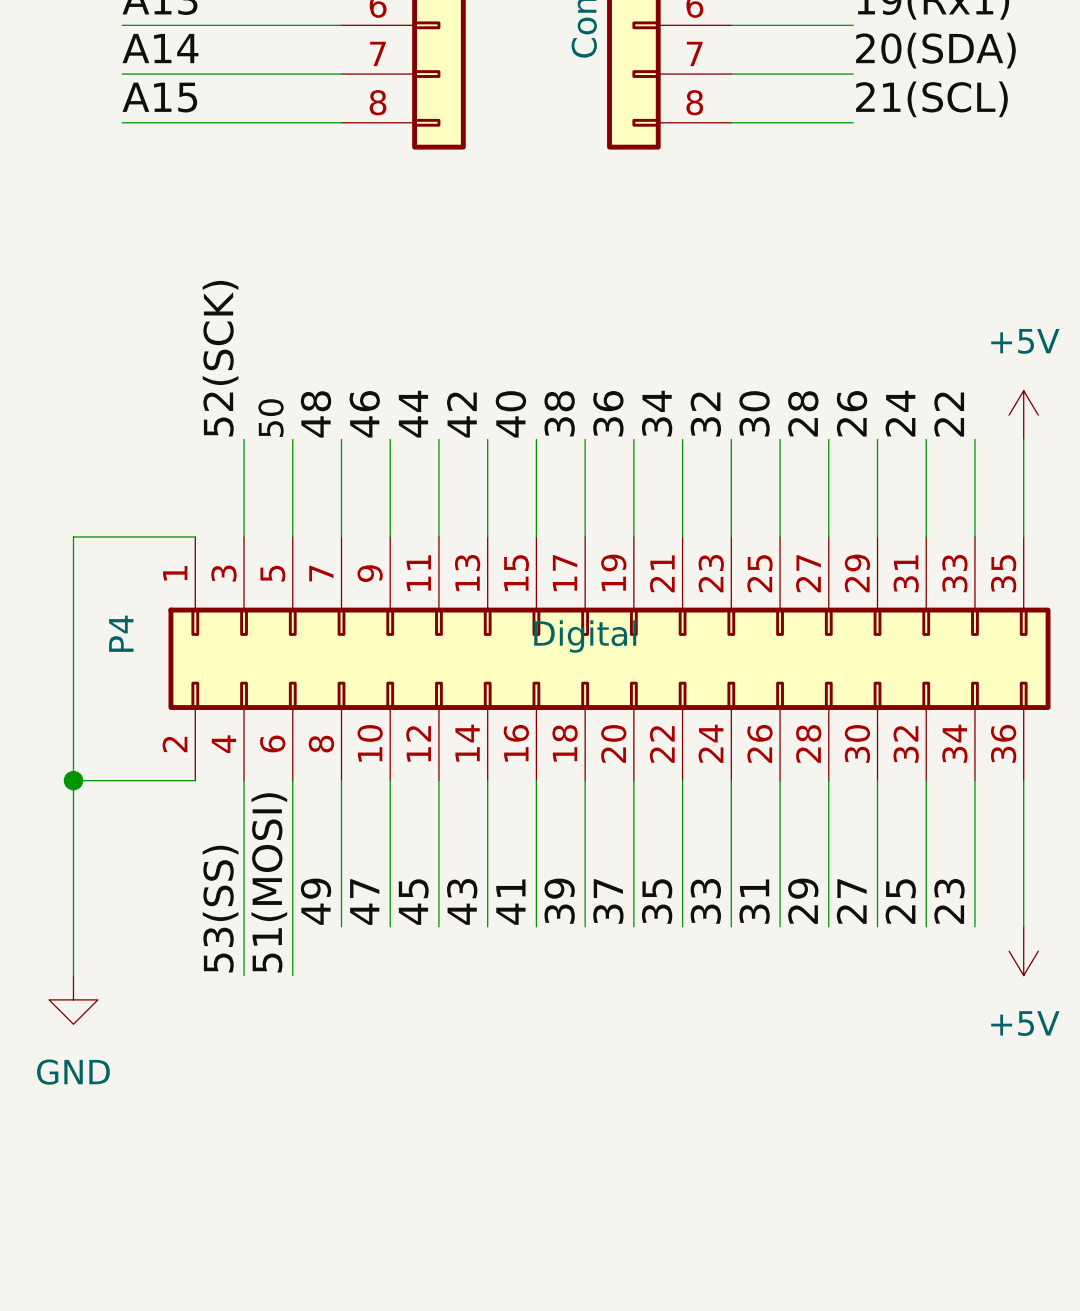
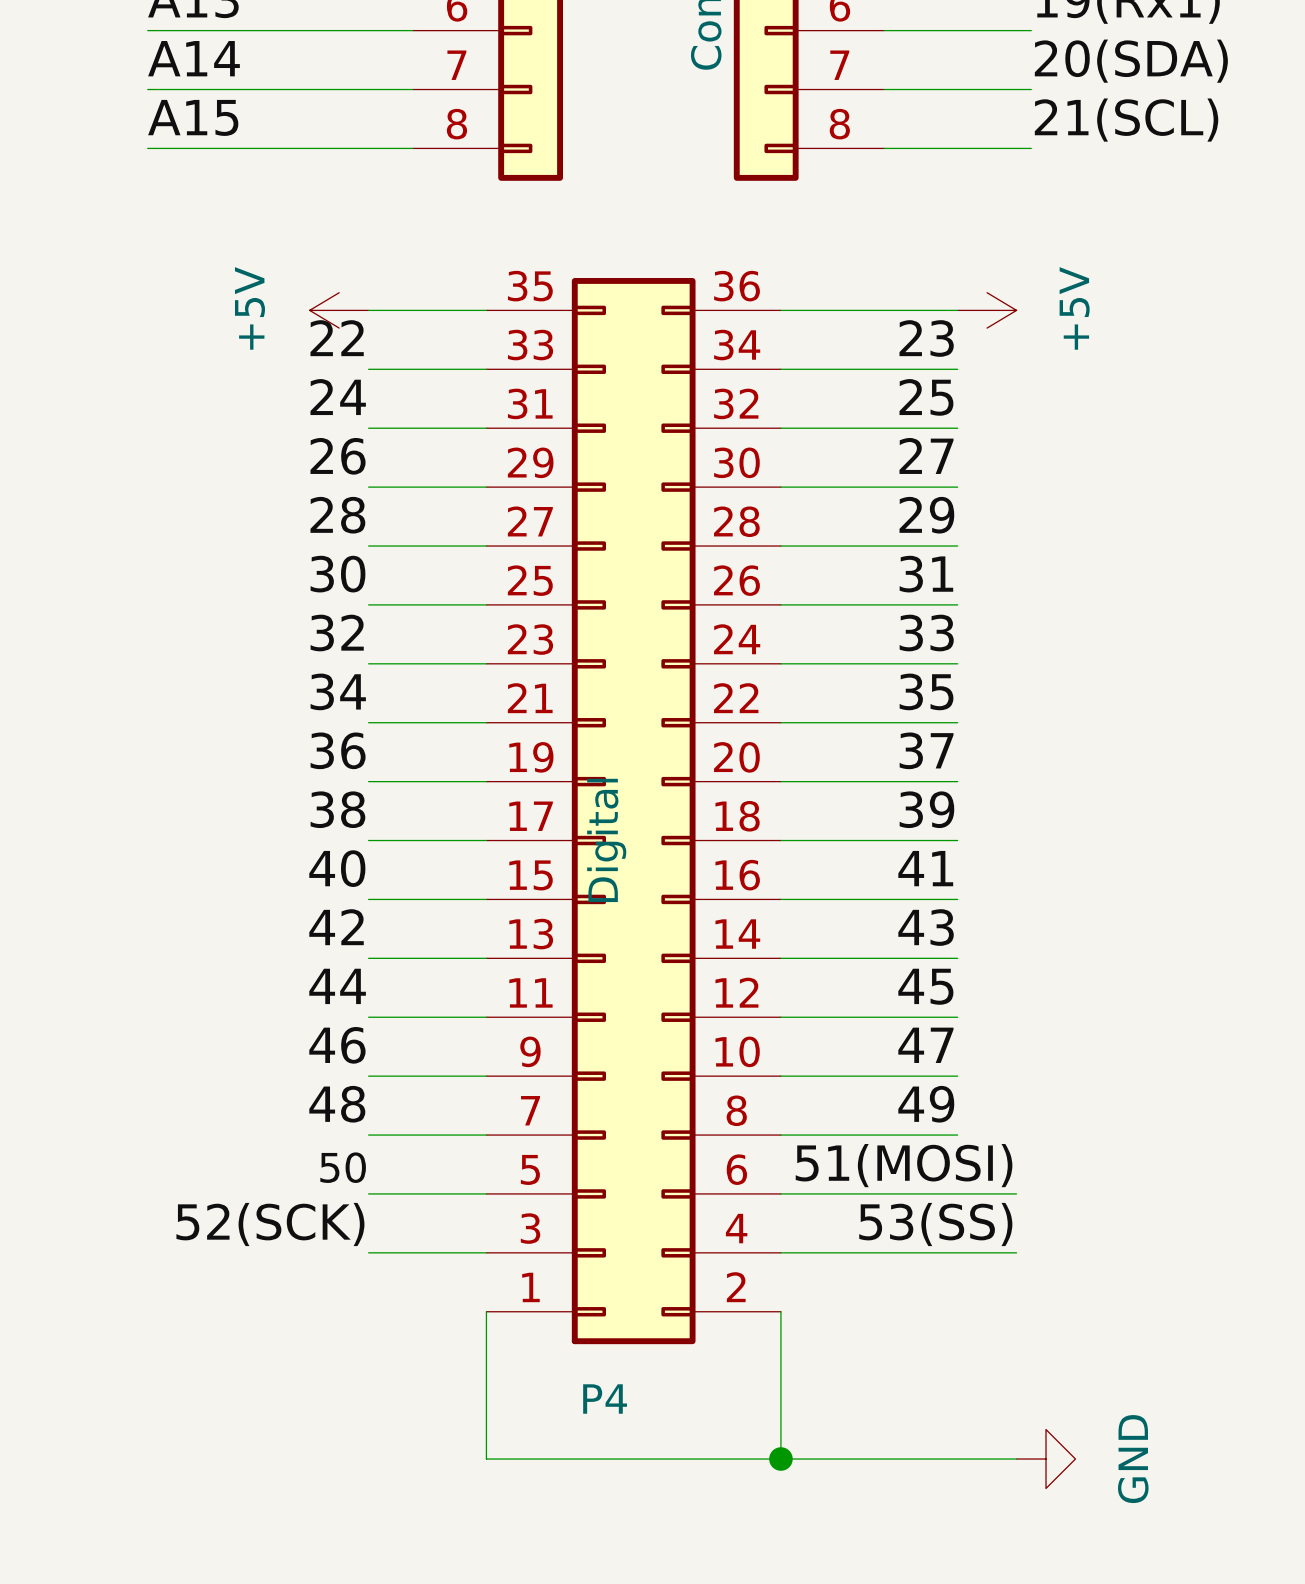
power symbol: none -> +5V (339, 310)
wire: none -> (368, 310) (486, 310)
wire: none -> (780, 310) (957, 310)
label: none -> 22 (337, 338)
label: none -> 23 (926, 338)
wire: none -> (368, 369) (486, 369)
wire: none -> (780, 369) (957, 369)
label: none -> 24 (338, 397)
label: none -> 25 (926, 397)
wire: none -> (368, 428) (486, 428)
wire: none -> (780, 428) (957, 428)
label: 52(SCK) (220, 358) -> none
label: none -> 26 (338, 456)
label: none -> 27 (926, 455)
wire: none -> (368, 487) (486, 487)
wire: none -> (780, 487) (957, 487)
label rotation: 0° (559, 413) -> 90° clockwise (337, 809)
label position: 38 (559, 413) -> 38 (337, 809)
label rotation: 0° (608, 413) -> 90° clockwise (338, 750)
label position: 36 (608, 413) -> 36 (338, 750)
label rotation: 0° (657, 413) -> 90° clockwise (338, 691)
label position: 34 (657, 413) -> 34 (338, 691)
label rotation: 0° (754, 413) -> 90° clockwise (338, 574)
label position: 30 (754, 413) -> 30 (338, 574)
label: 28 (803, 413) -> none
label: 26 (852, 413) -> none
label: 24 (900, 413) -> none
label: 48 (316, 414) -> none
label rotation: 0° (364, 414) -> 90° clockwise (337, 1045)
label position: 46 (364, 414) -> 46 (337, 1045)
label rotation: 0° (413, 414) -> 90° clockwise (337, 986)
label position: 44 (413, 414) -> 44 (337, 986)
label rotation: 0° (510, 414) -> 90° clockwise (337, 868)
label position: 40 (510, 414) -> 40 (337, 868)
label rotation: 0° (705, 414) -> 90° clockwise (337, 633)
label position: 32 (705, 414) -> 32 (337, 633)
label: 22 (949, 414) -> none
label rotation: 0° (461, 415) -> 90° clockwise (336, 927)
label position: 42 (461, 415) -> 42 (336, 927)
power symbol rotation: 0° (1023, 415) -> 90° clockwise (987, 310)
power symbol position: +5V (1023, 415) -> +5V (987, 310)
label: 50 (271, 418) -> none
label: none -> 28 (337, 515)
label: none -> 29 (926, 515)
wire: (244, 439) (244, 536) -> none
wire: (292, 439) (292, 536) -> none
wire: (341, 439) (341, 536) -> none
wire: (390, 439) (390, 536) -> none
wire: (438, 439) (438, 536) -> none
wire: (585, 439) (585, 536) -> none
wire: (633, 439) (633, 536) -> none
wire: (682, 439) (682, 536) -> none
wire: (731, 439) (731, 536) -> none
wire: (780, 439) (780, 536) -> none
wire: (828, 439) (828, 536) -> none
wire: (877, 439) (877, 536) -> none
wire: (926, 439) (926, 536) -> none
wire: (974, 439) (974, 536) -> none
wire: (1023, 439) (1023, 536) -> none
wire: none -> (368, 546) (486, 546)
wire: none -> (780, 546) (957, 546)
wire: none -> (368, 604) (486, 604)
wire: none -> (780, 604) (957, 604)
wire: (195, 536) (73, 536) (73, 975) -> none
wire: none -> (368, 663) (486, 663)
wire: none -> (780, 663) (957, 663)
wire: none -> (368, 722) (486, 722)
wire: none -> (780, 722) (957, 722)
P4 rotation: 0° (609, 658) -> 90° counterclockwise (633, 811)
wire: none -> (368, 899) (486, 899)
wire: none -> (780, 899) (957, 899)
wire: (73, 780) (195, 780) -> none
junction: (73, 780) -> none
wire: (244, 780) (244, 975) -> none
wire: (292, 780) (292, 975) -> none
wire: (341, 780) (341, 926) -> none
wire: (390, 780) (390, 926) -> none
wire: (438, 780) (438, 926) -> none
wire: (585, 780) (585, 926) -> none
wire: (633, 780) (633, 926) -> none
wire: (682, 780) (682, 926) -> none
wire: (731, 780) (731, 926) -> none
wire: (780, 780) (780, 926) -> none
wire: (828, 780) (828, 926) -> none
wire: (877, 780) (877, 926) -> none
wire: (926, 780) (926, 926) -> none
wire: (974, 780) (974, 926) -> none
wire: (1023, 780) (1023, 926) -> none
wire: none -> (368, 958) (486, 958)
wire: none -> (780, 958) (957, 958)
wire: none -> (368, 1017) (486, 1017)
wire: none -> (780, 1017) (957, 1017)
label: 51(MOSI) (269, 882) -> none
wire: none -> (368, 1076) (486, 1076)
wire: none -> (780, 1076) (957, 1076)
label rotation: 0° (316, 901) -> 90° clockwise (926, 1104)
label position: 49 (316, 901) -> 49 (926, 1104)
label rotation: 0° (462, 901) -> 90° clockwise (926, 927)
label position: 43 (462, 901) -> 43 (926, 927)
label rotation: 0° (559, 901) -> 90° clockwise (926, 809)
label position: 39 (559, 901) -> 39 (926, 809)
label rotation: 0° (608, 901) -> 90° clockwise (926, 750)
label position: 37 (608, 901) -> 37 (926, 750)
label rotation: 0° (657, 901) -> 90° clockwise (926, 691)
label position: 35 (657, 901) -> 35 (926, 691)
label rotation: 0° (705, 901) -> 90° clockwise (926, 633)
label position: 33 (705, 901) -> 33 (926, 633)
label rotation: 0° (754, 901) -> 90° clockwise (926, 574)
label position: 31 (754, 901) -> 31 (926, 574)
label: 29 (803, 901) -> none
label: 27 (851, 901) -> none
label: 25 (900, 901) -> none
label: 23 (949, 901) -> none
label rotation: 0° (364, 902) -> 90° clockwise (925, 1045)
label position: 47 (364, 902) -> 47 (925, 1045)
label rotation: 0° (413, 902) -> 90° clockwise (925, 986)
label position: 45 (413, 902) -> 45 (925, 986)
label rotation: 0° (510, 902) -> 90° clockwise (925, 868)
label position: 41 (510, 902) -> 41 (925, 868)
label: 53(SS) (220, 909) -> none
label: none -> 48 (337, 1104)
wire: none -> (368, 1135) (486, 1135)
wire: none -> (780, 1135) (957, 1135)
power symbol: +5V (1023, 951) -> none
label: none -> 51(MOSI) (904, 1165)
label: none -> 50 (343, 1167)
wire: none -> (368, 1193) (486, 1193)
wire: none -> (780, 1193) (1016, 1193)
power symbol: GND (73, 999) -> none
label: none -> 52(SCK) (270, 1224)
label: none -> 53(SS) (935, 1224)
wire: none -> (368, 1252) (486, 1252)
wire: none -> (780, 1252) (1016, 1252)
wire: none -> (486, 1311) (486, 1459) (1016, 1459)
wire: none -> (780, 1311) (780, 1459)
junction: none -> (780, 1459)
power symbol: none -> GND (1046, 1459)

